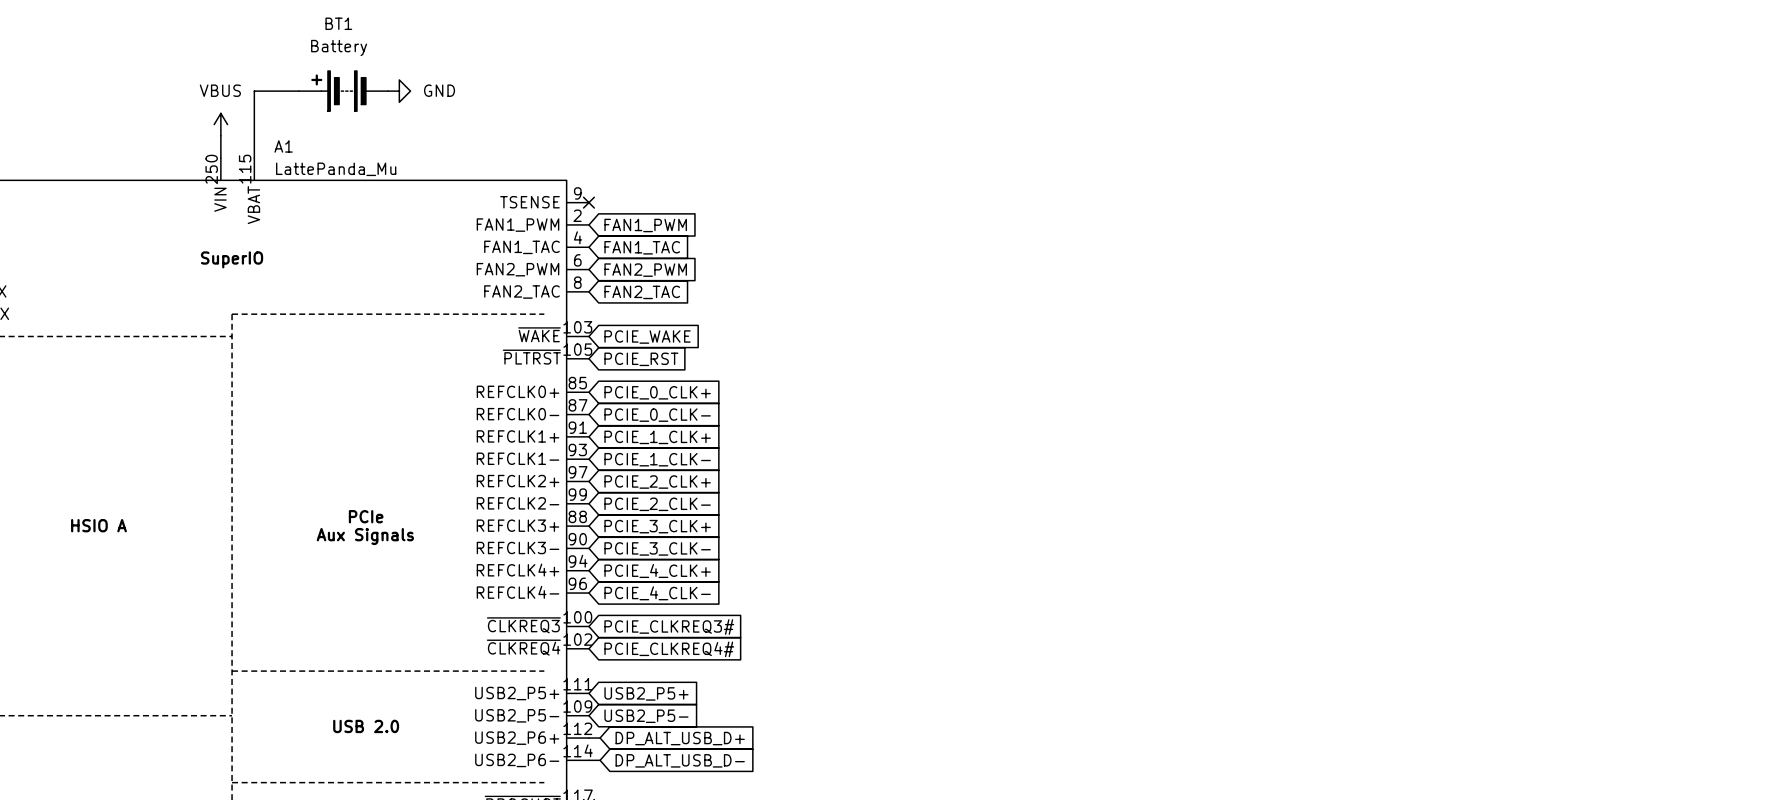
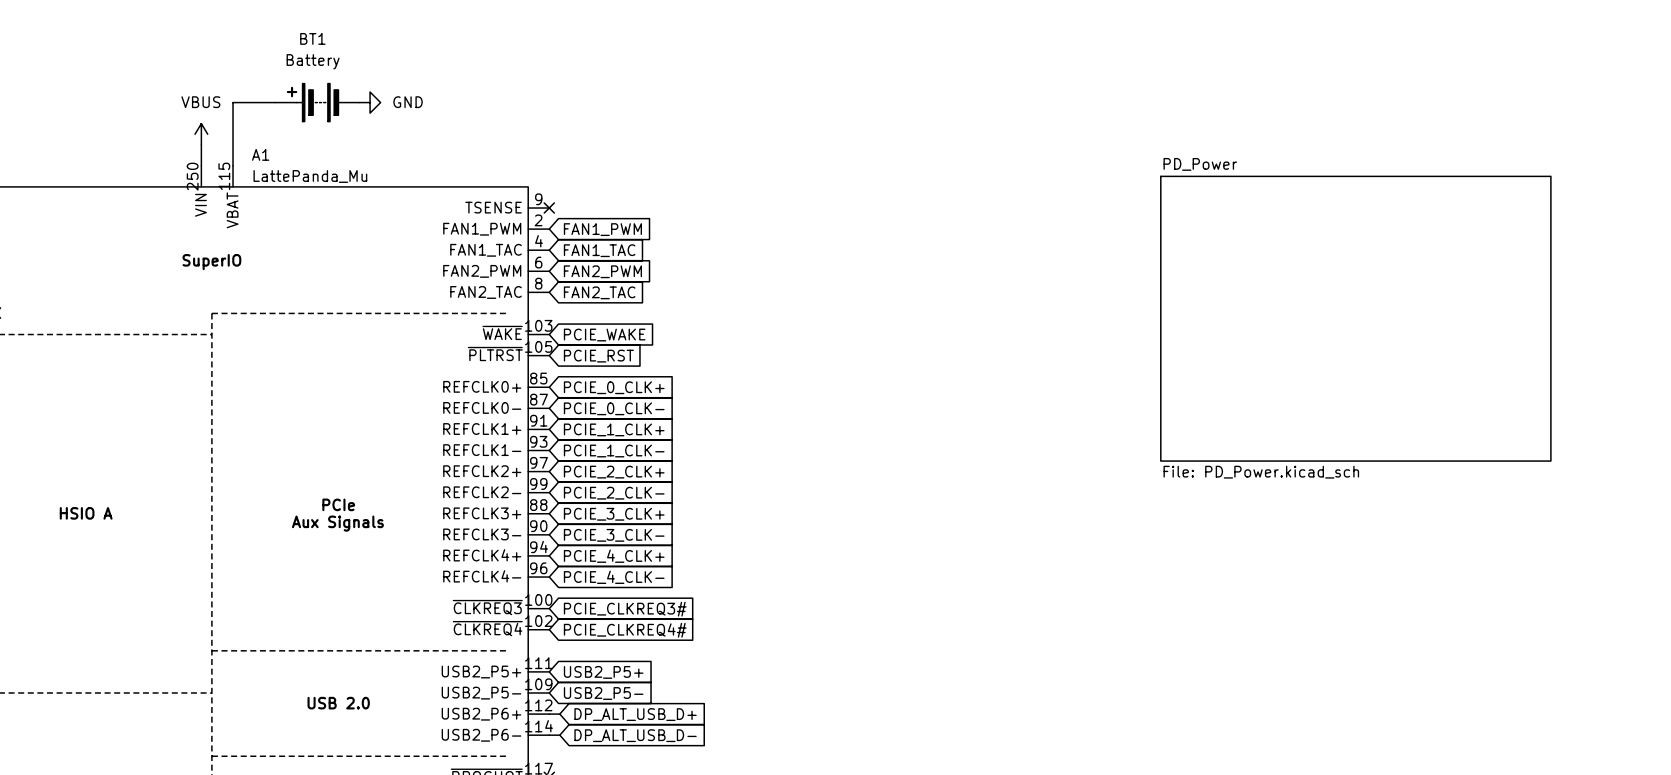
sheet PD_Power: none -> File: PD_Power.kicad_sch (1355, 318)

